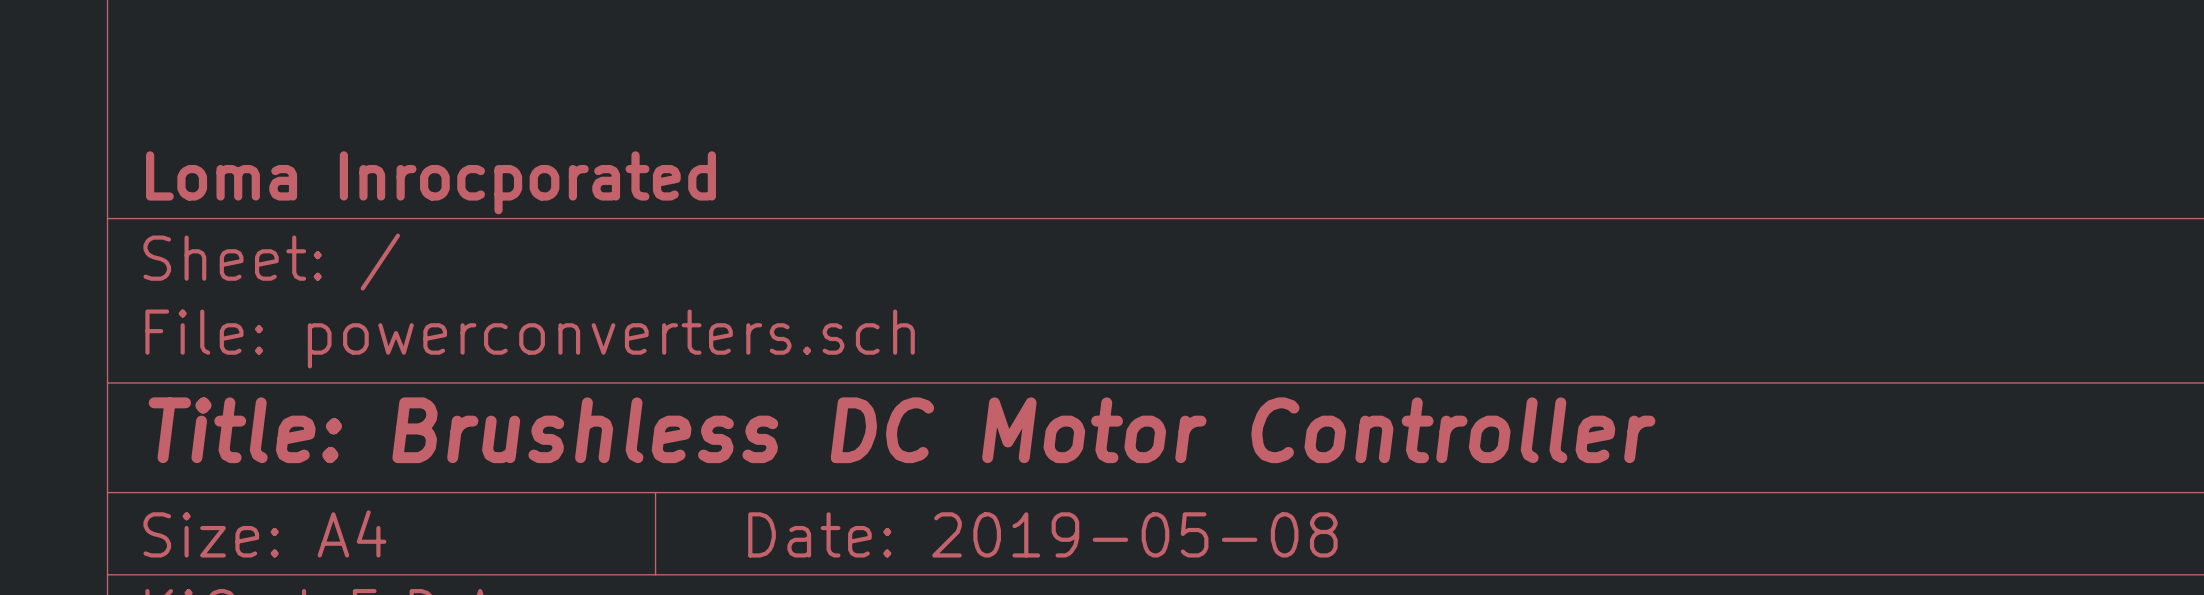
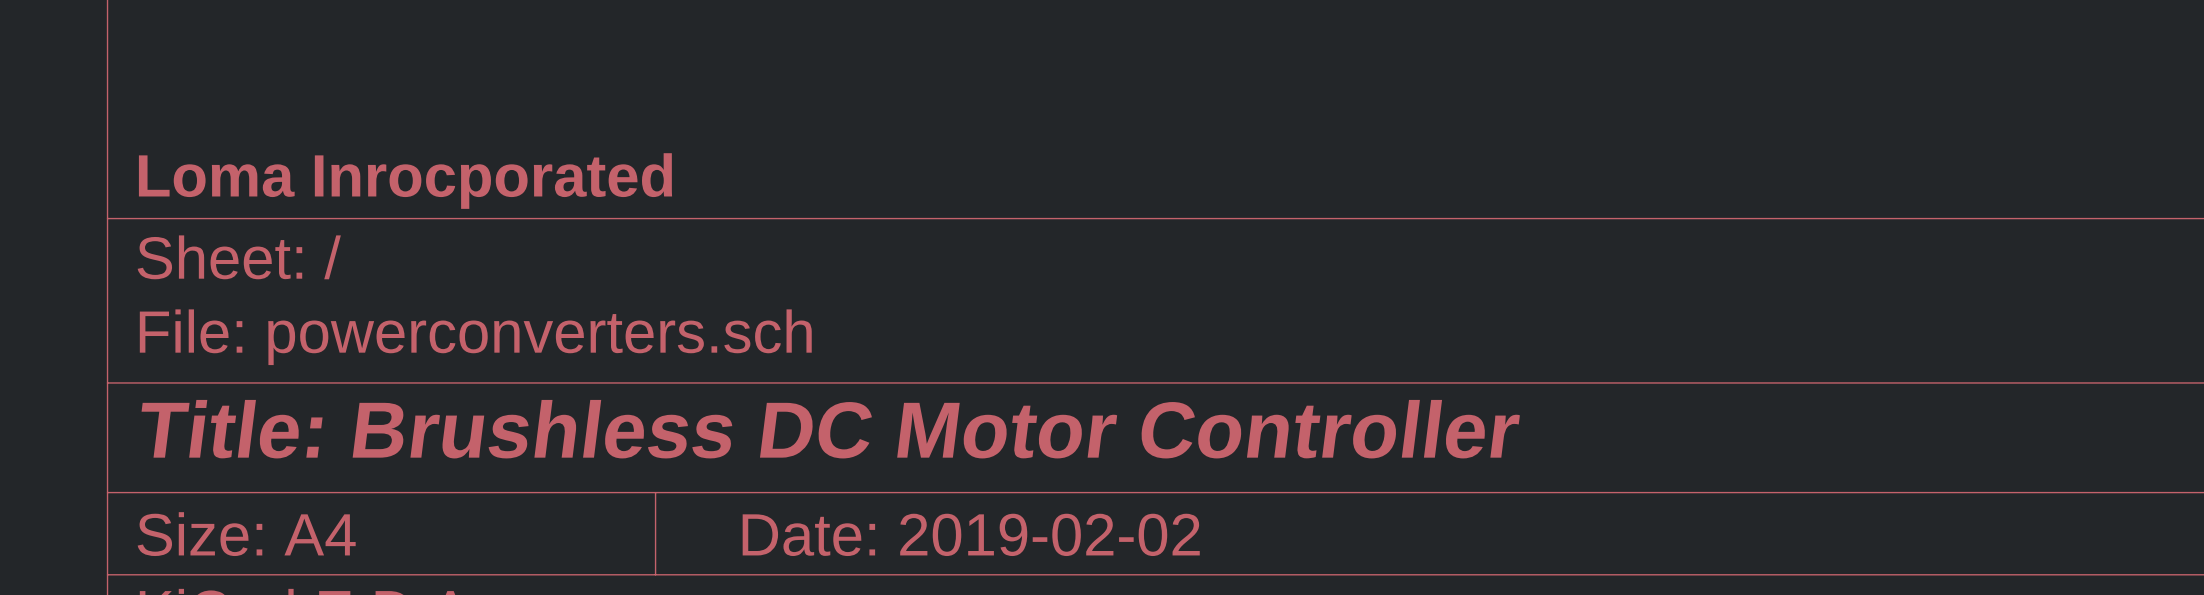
title block: Date: 2019-05-08 (1042, 534) -> Date: 2019-02-02 (971, 534)

